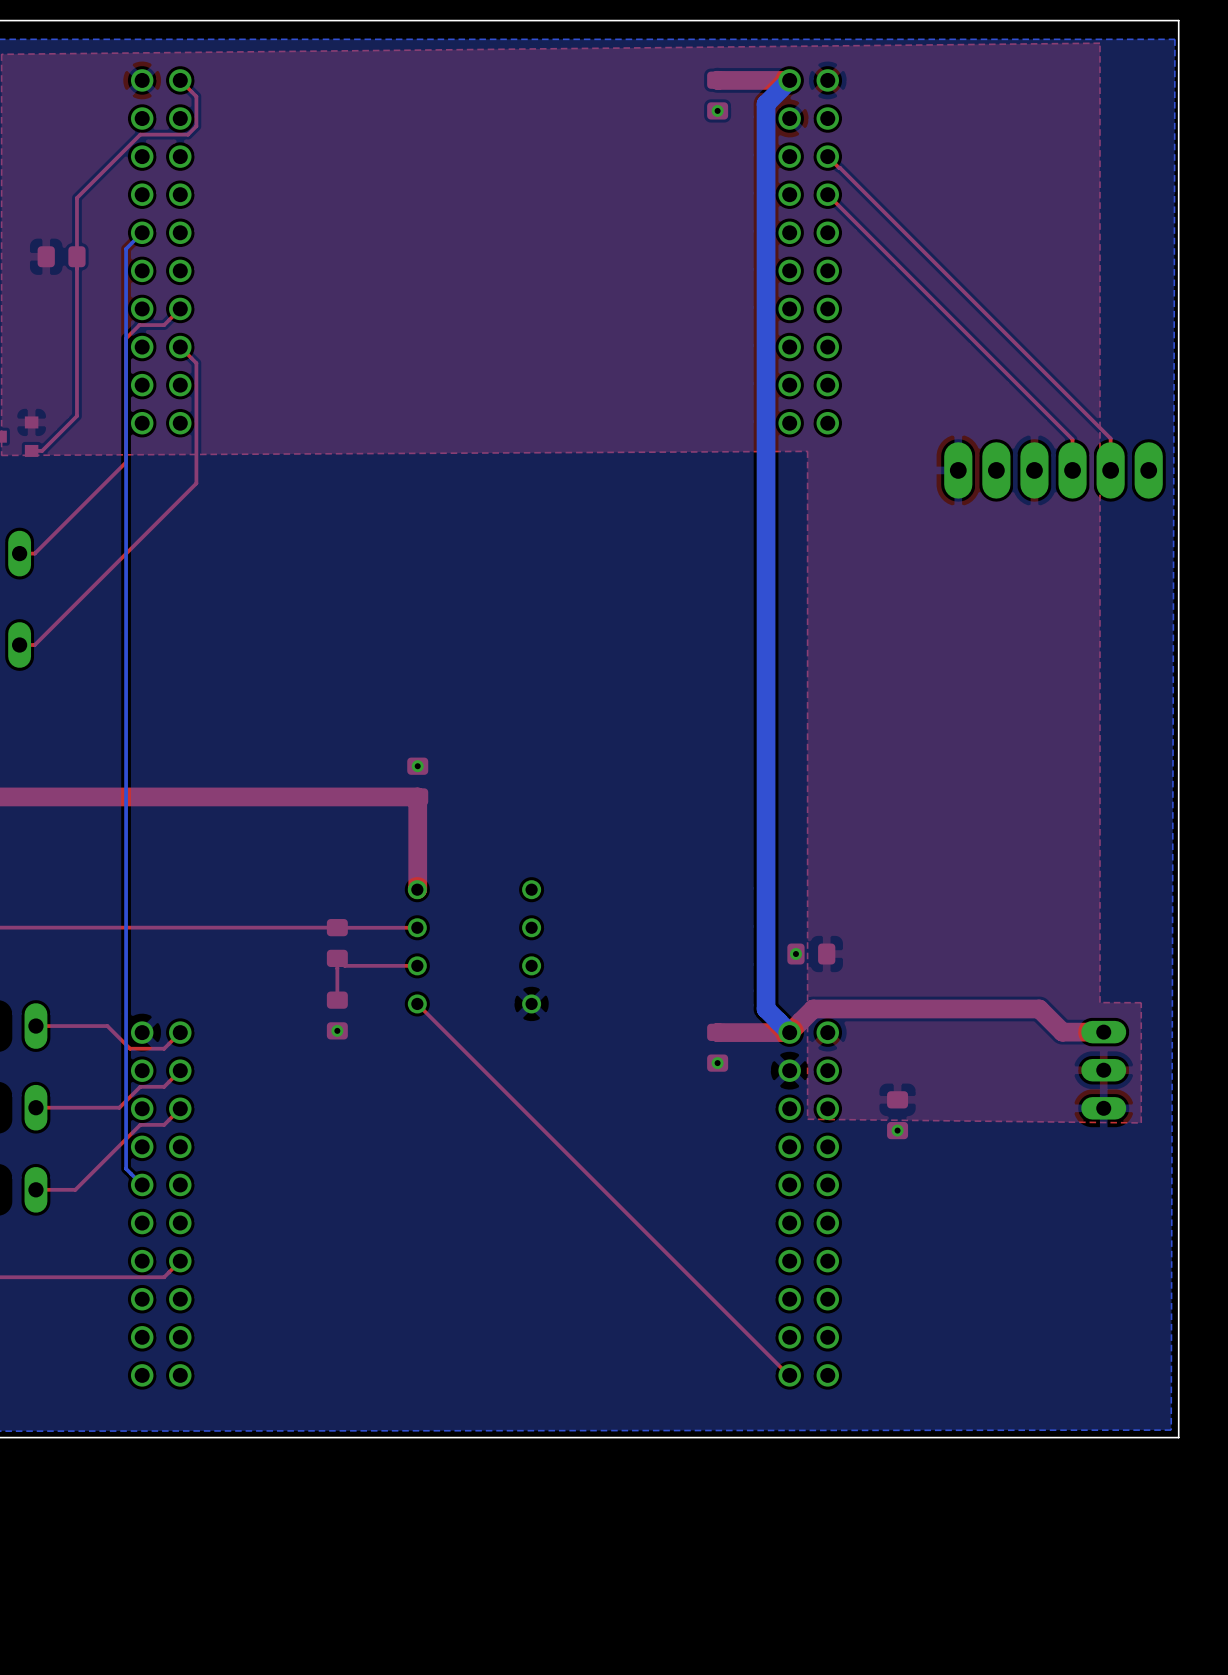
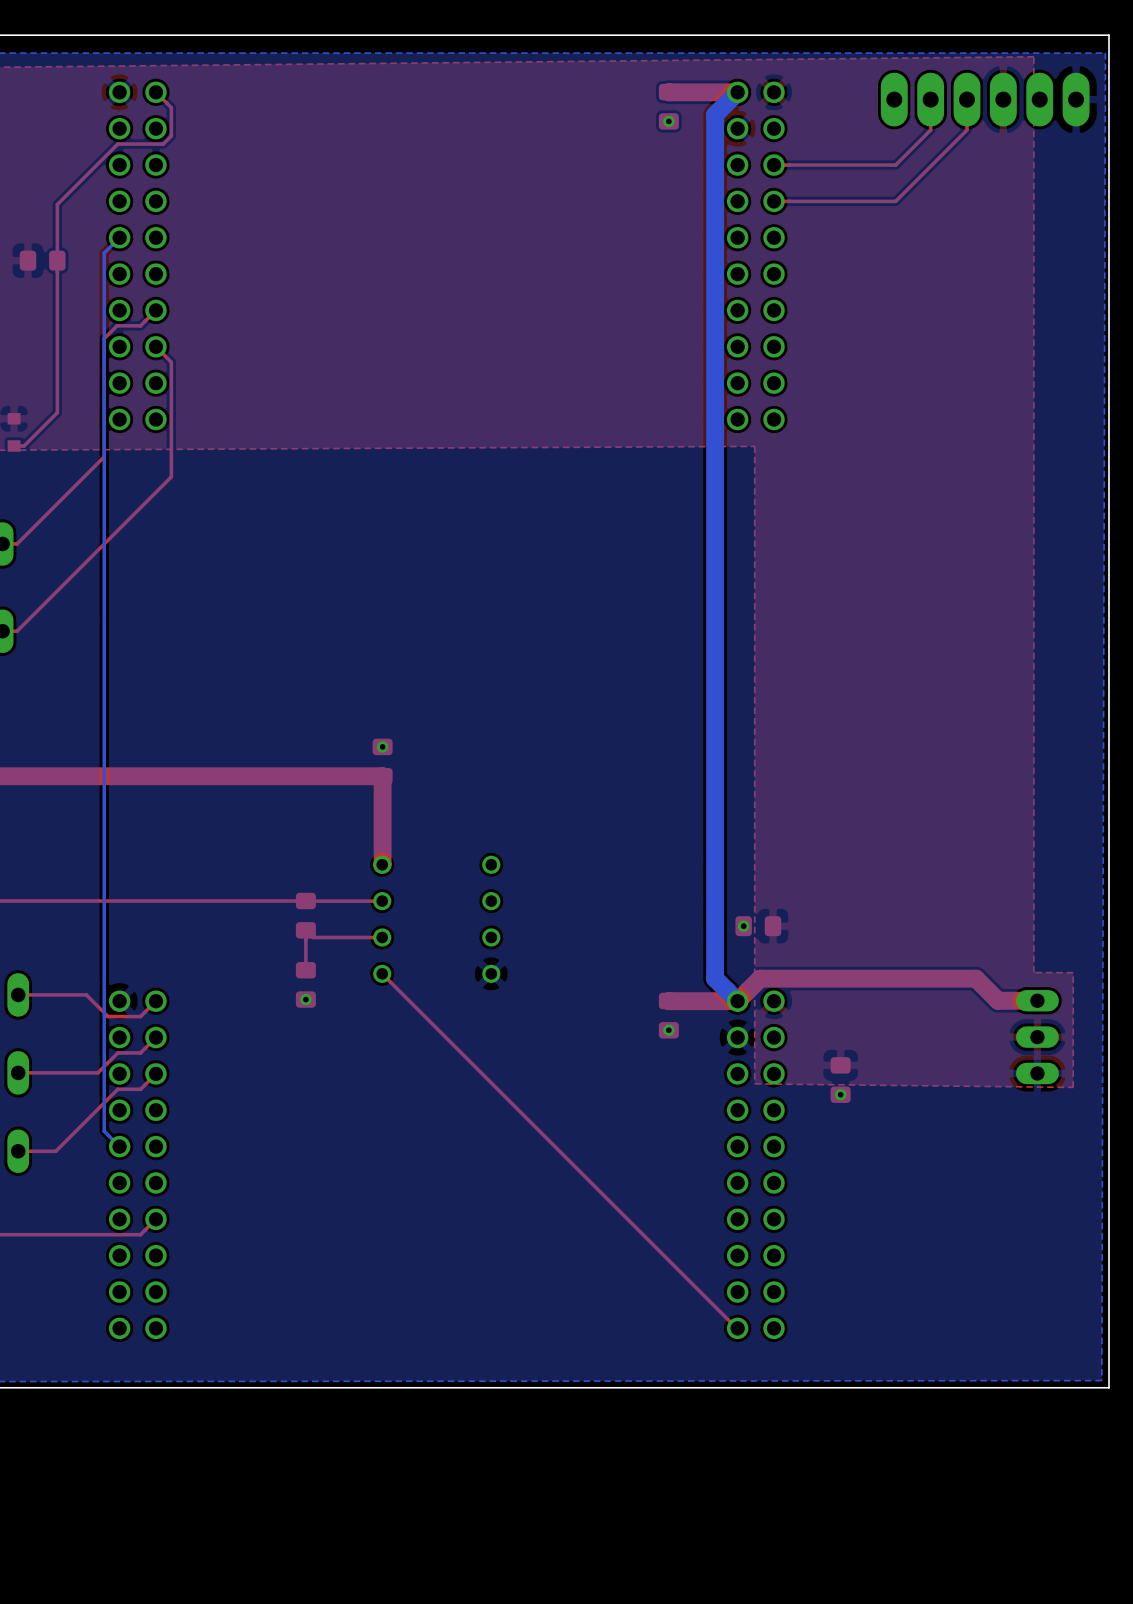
part: none -> (985, 99)
top track: (827, 156) (1110, 438) (1110, 470) -> (774, 165) (895, 165) (930, 130) (930, 99)
top track: (827, 194) (1072, 439) (1072, 470) -> (774, 201) (895, 201) (967, 130) (967, 99)
part: (1053, 470) -> none

